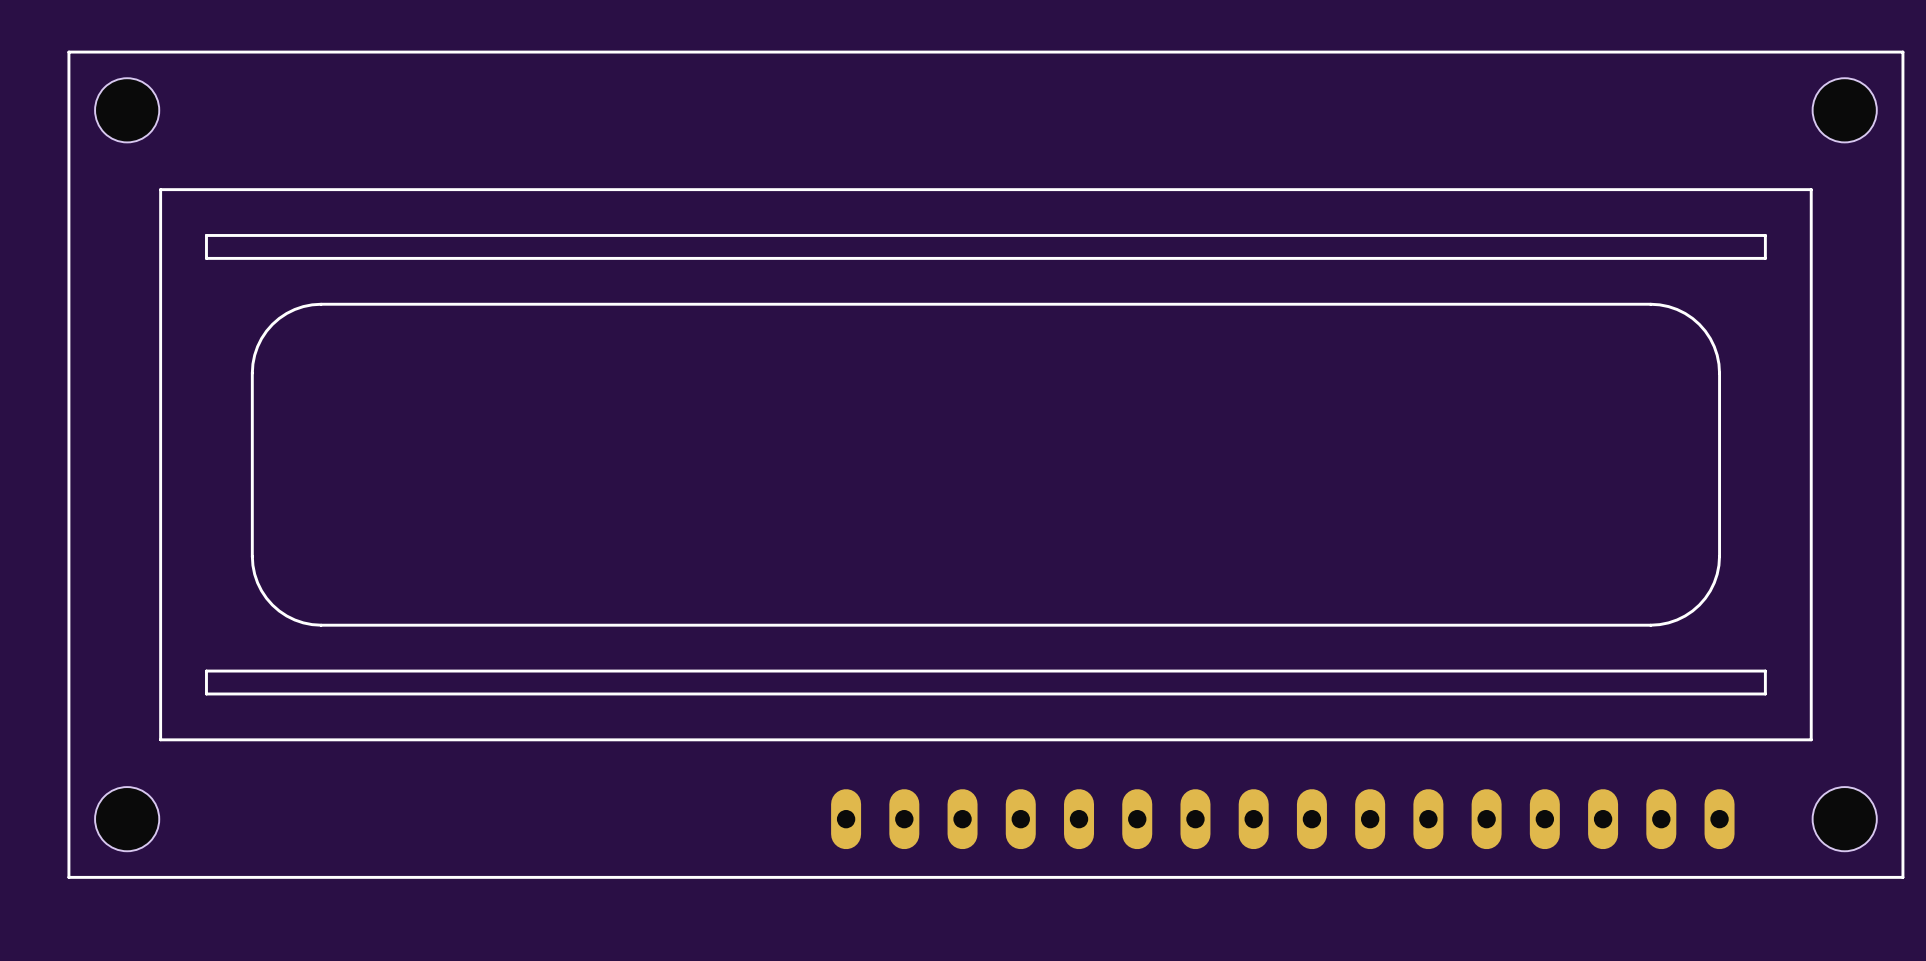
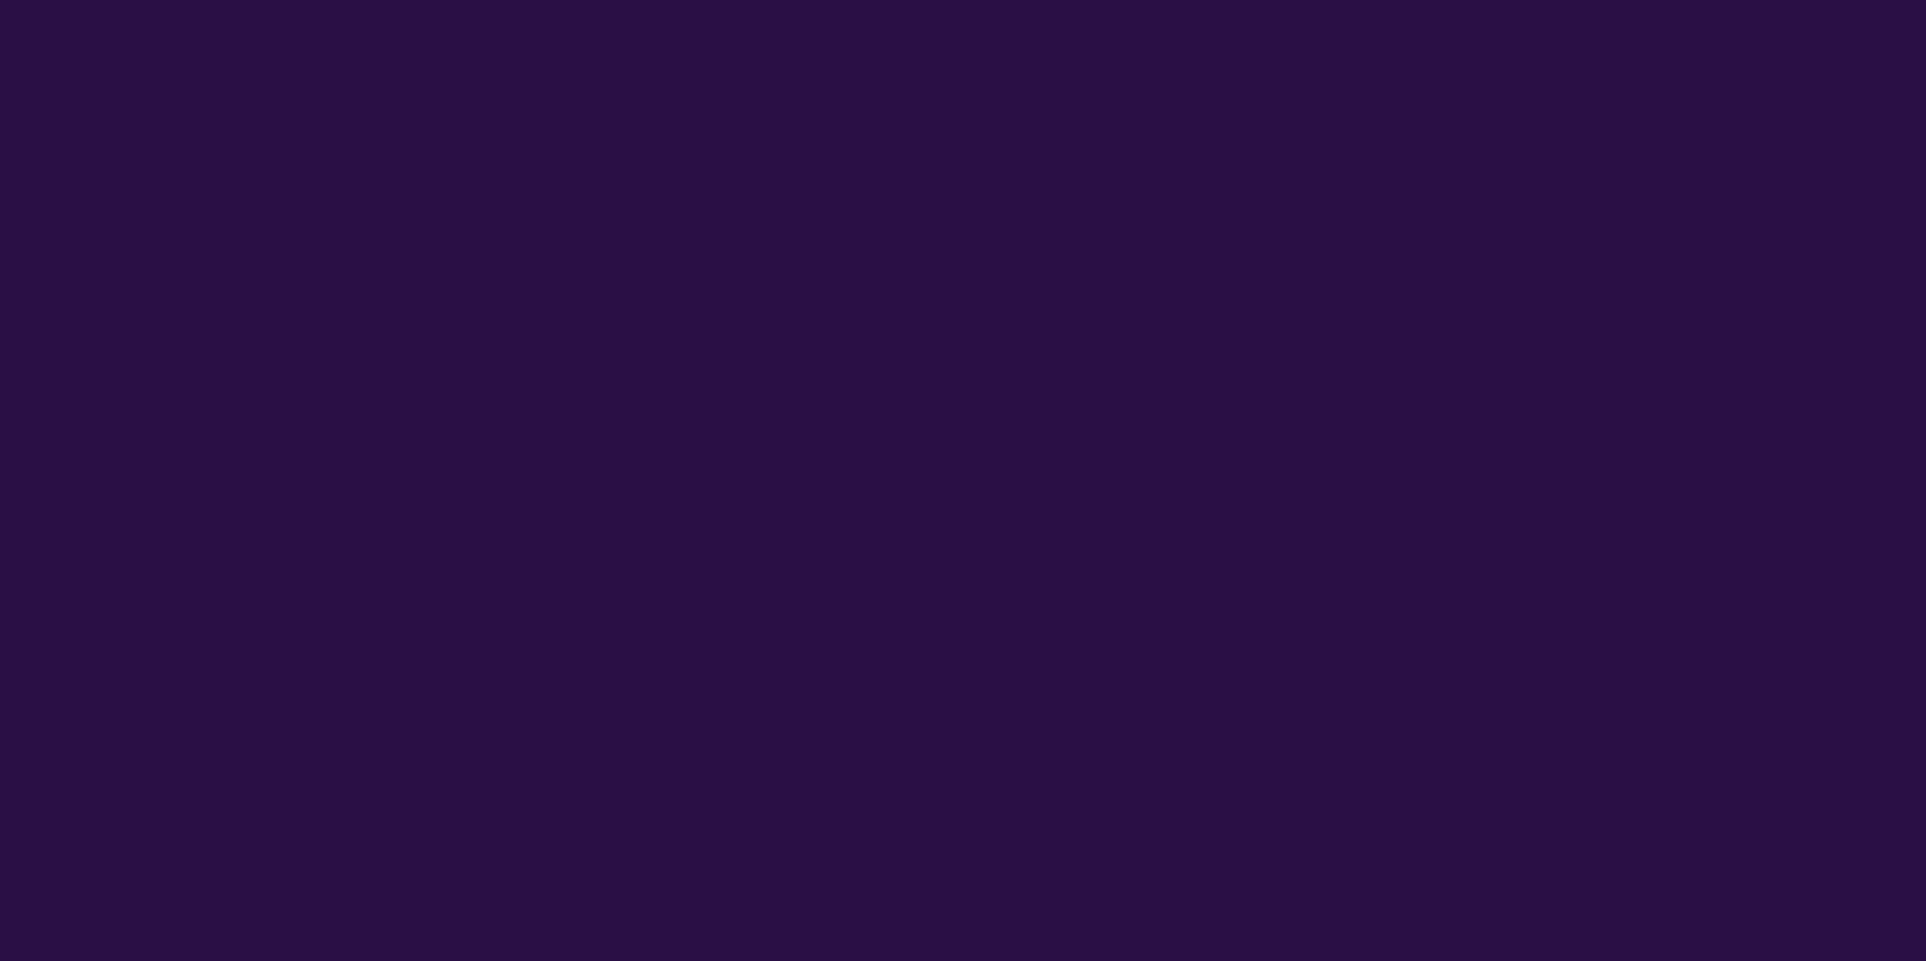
part: (985, 464) -> none

